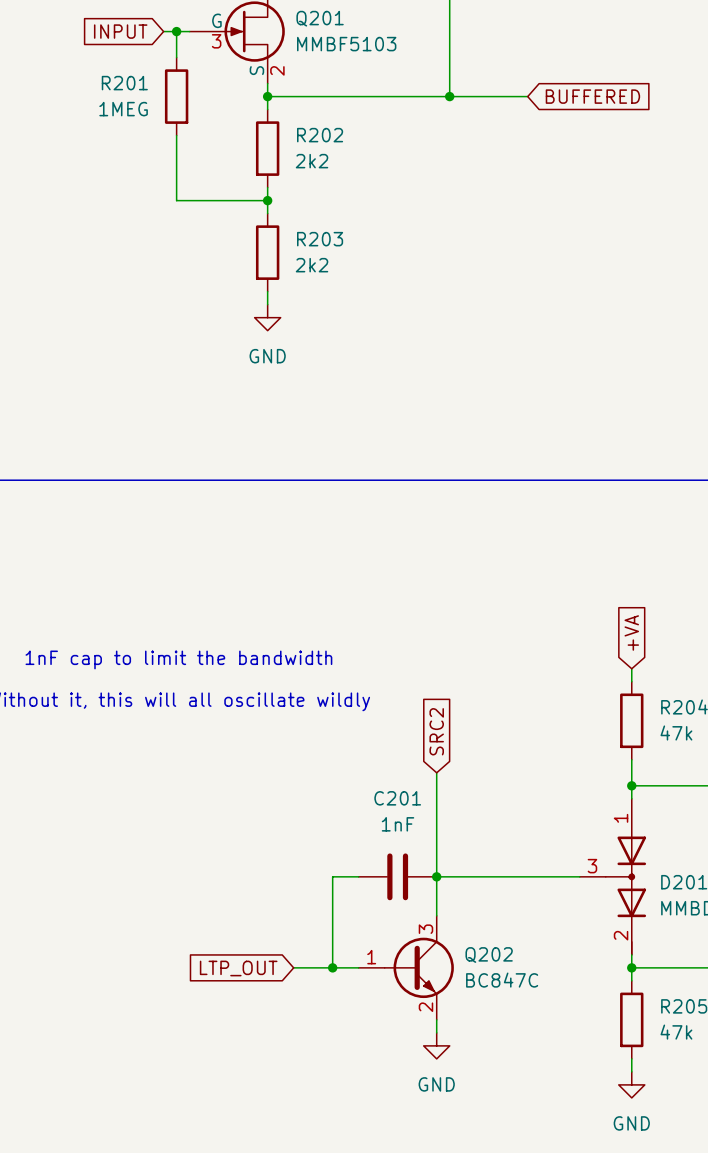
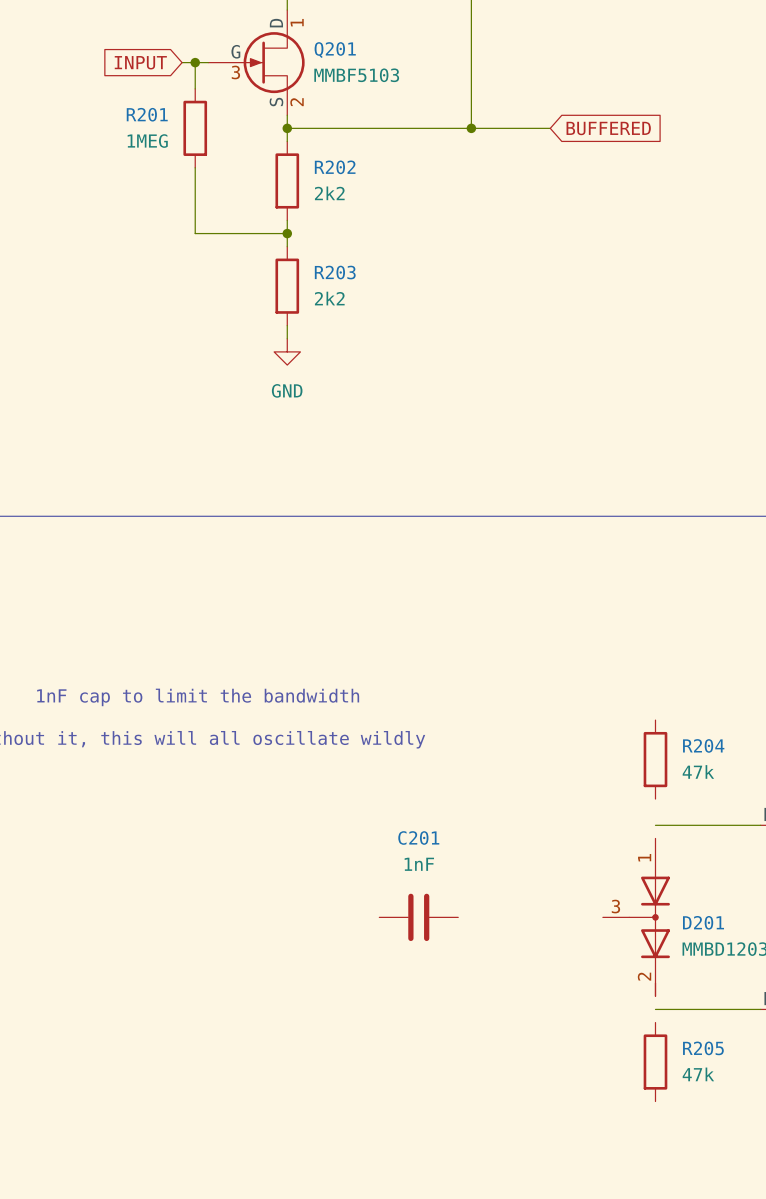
global label: +VA (631, 632) -> none
wire: (631, 668) (631, 681) -> none
global label: SRC2 (436, 731) -> none
wire: (631, 759) (631, 798) -> none
wire: (436, 772) (436, 915) -> none
junction: (631, 785) -> none
wire: (358, 876) (332, 876) (332, 967) -> none
wire: (436, 876) (579, 876) -> none
junction: (436, 876) -> none
wire: (631, 954) (631, 980) -> none
wire: (293, 967) (358, 967) -> none
junction: (332, 967) -> none
Q202: BC847C (406, 967) -> none
junction: (631, 967) -> none
global label: LTP_OUT (238, 968) -> none
wire: (436, 1019) (436, 1032) -> none
power symbol: GND (436, 1045) -> none
wire: (631, 1058) (631, 1071) -> none
power symbol: GND (631, 1084) -> none

